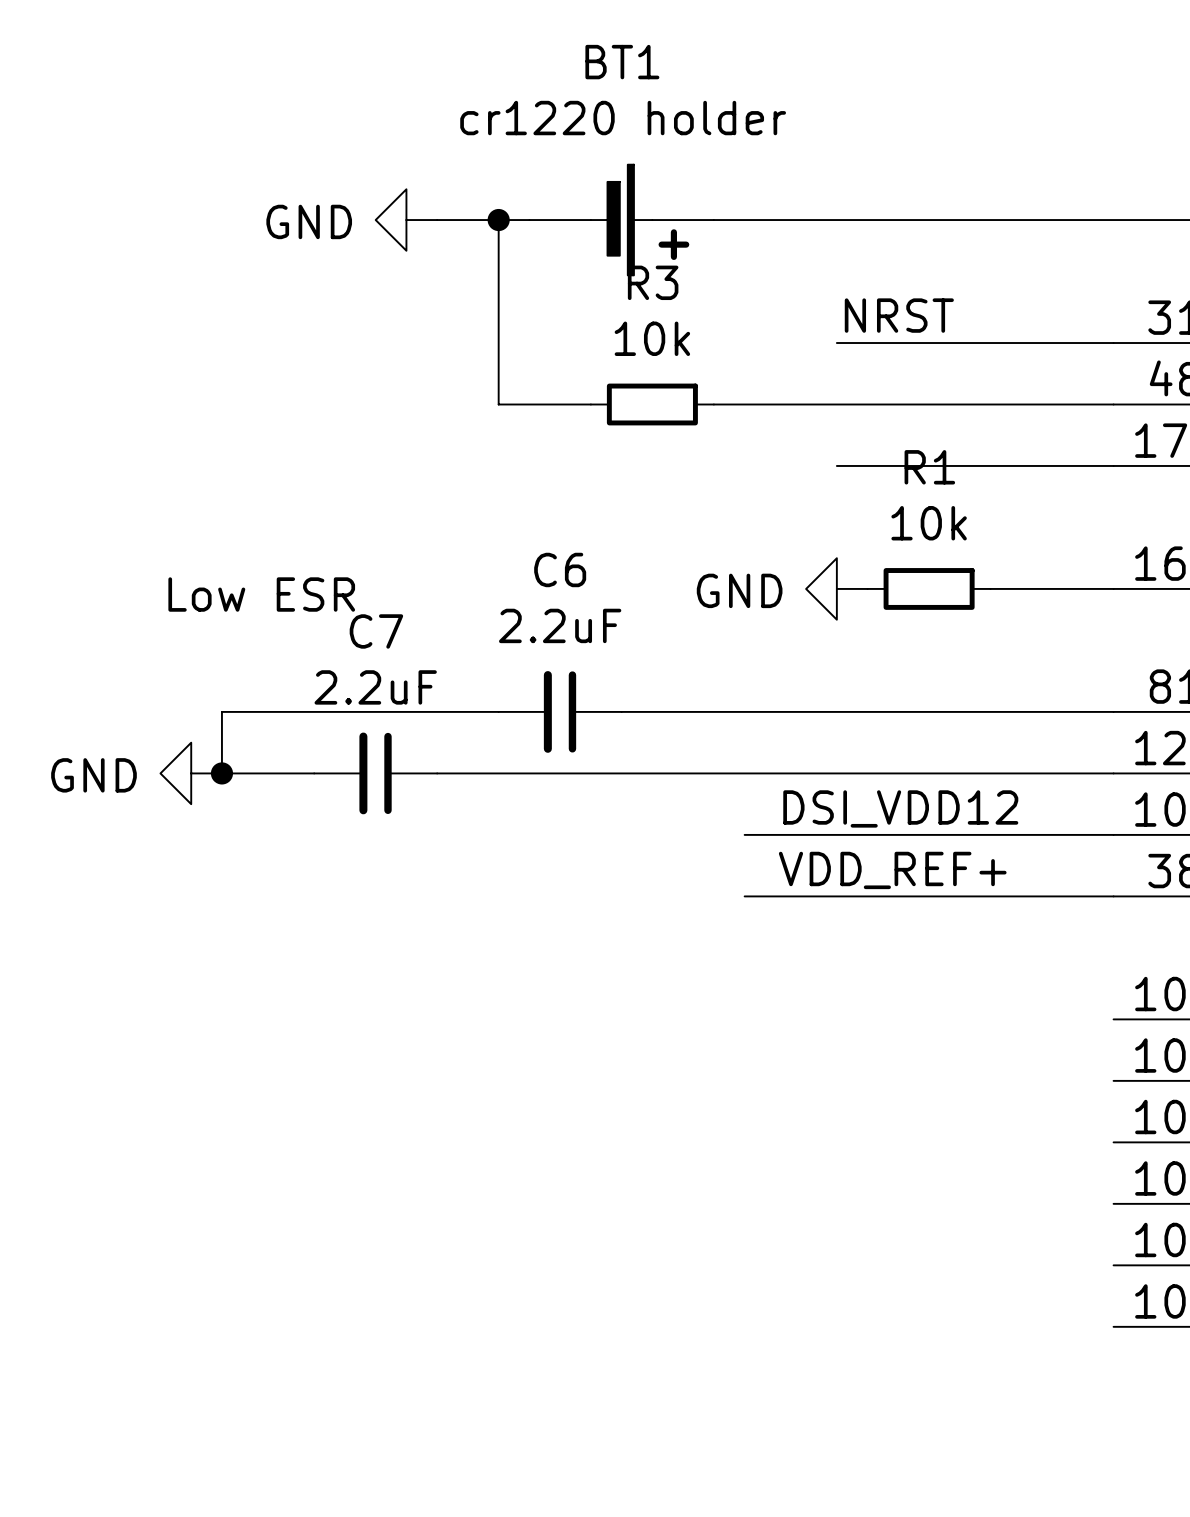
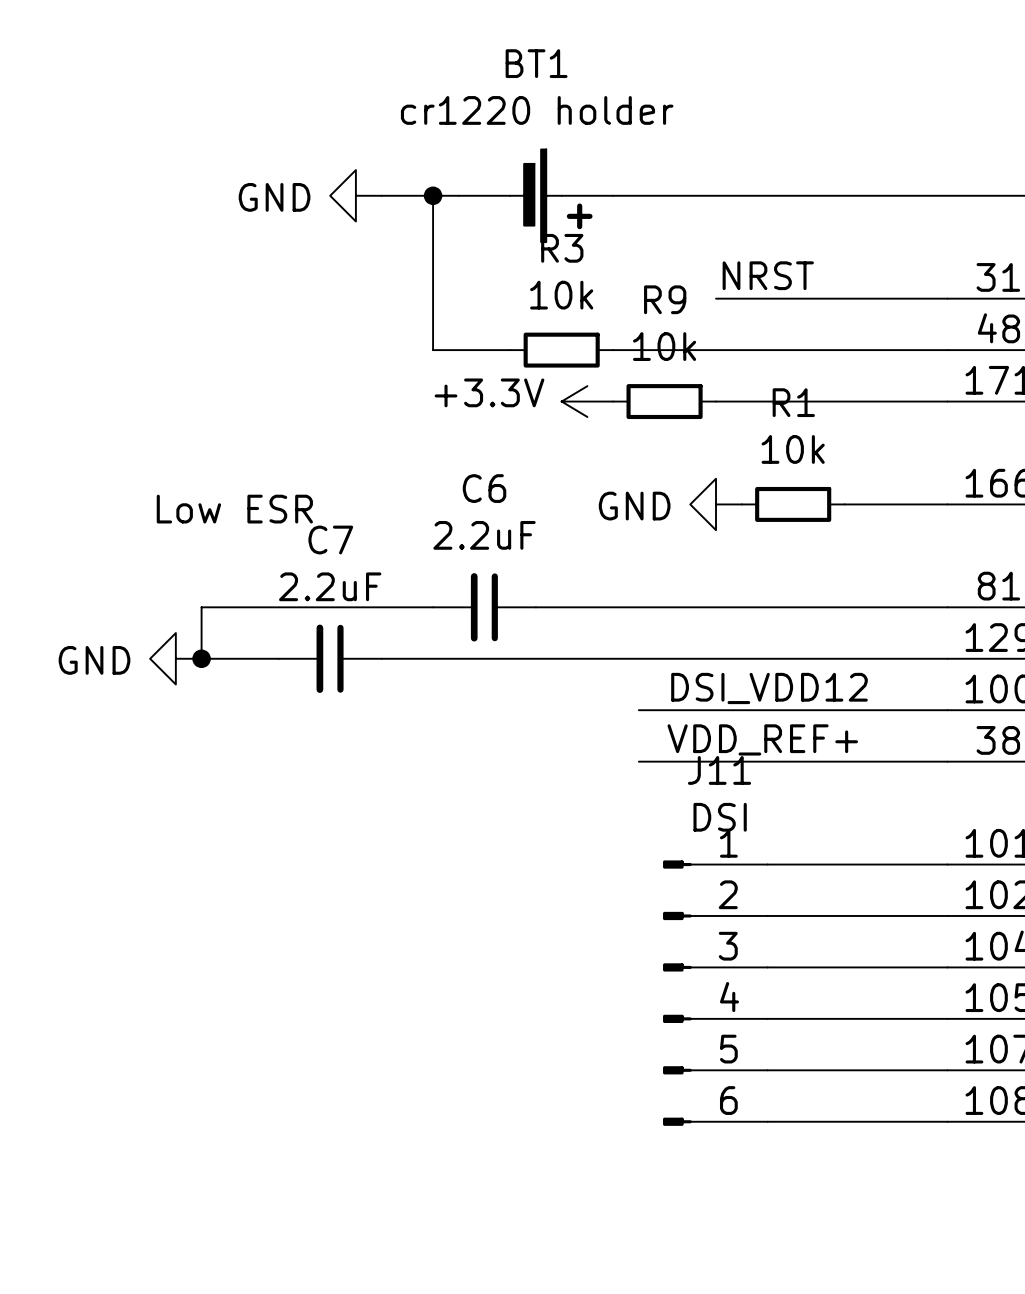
power symbol: none -> +3.3V (587, 401)
R9: none -> 10k (664, 401)
wire: none -> (767, 864) (947, 864)
wire: none -> (767, 915) (947, 915)
wire: none -> (767, 967) (947, 967)
J11: none -> DSI (715, 993)
wire: none -> (767, 1018) (947, 1018)
wire: none -> (767, 1070) (947, 1070)
wire: none -> (767, 1121) (947, 1121)

